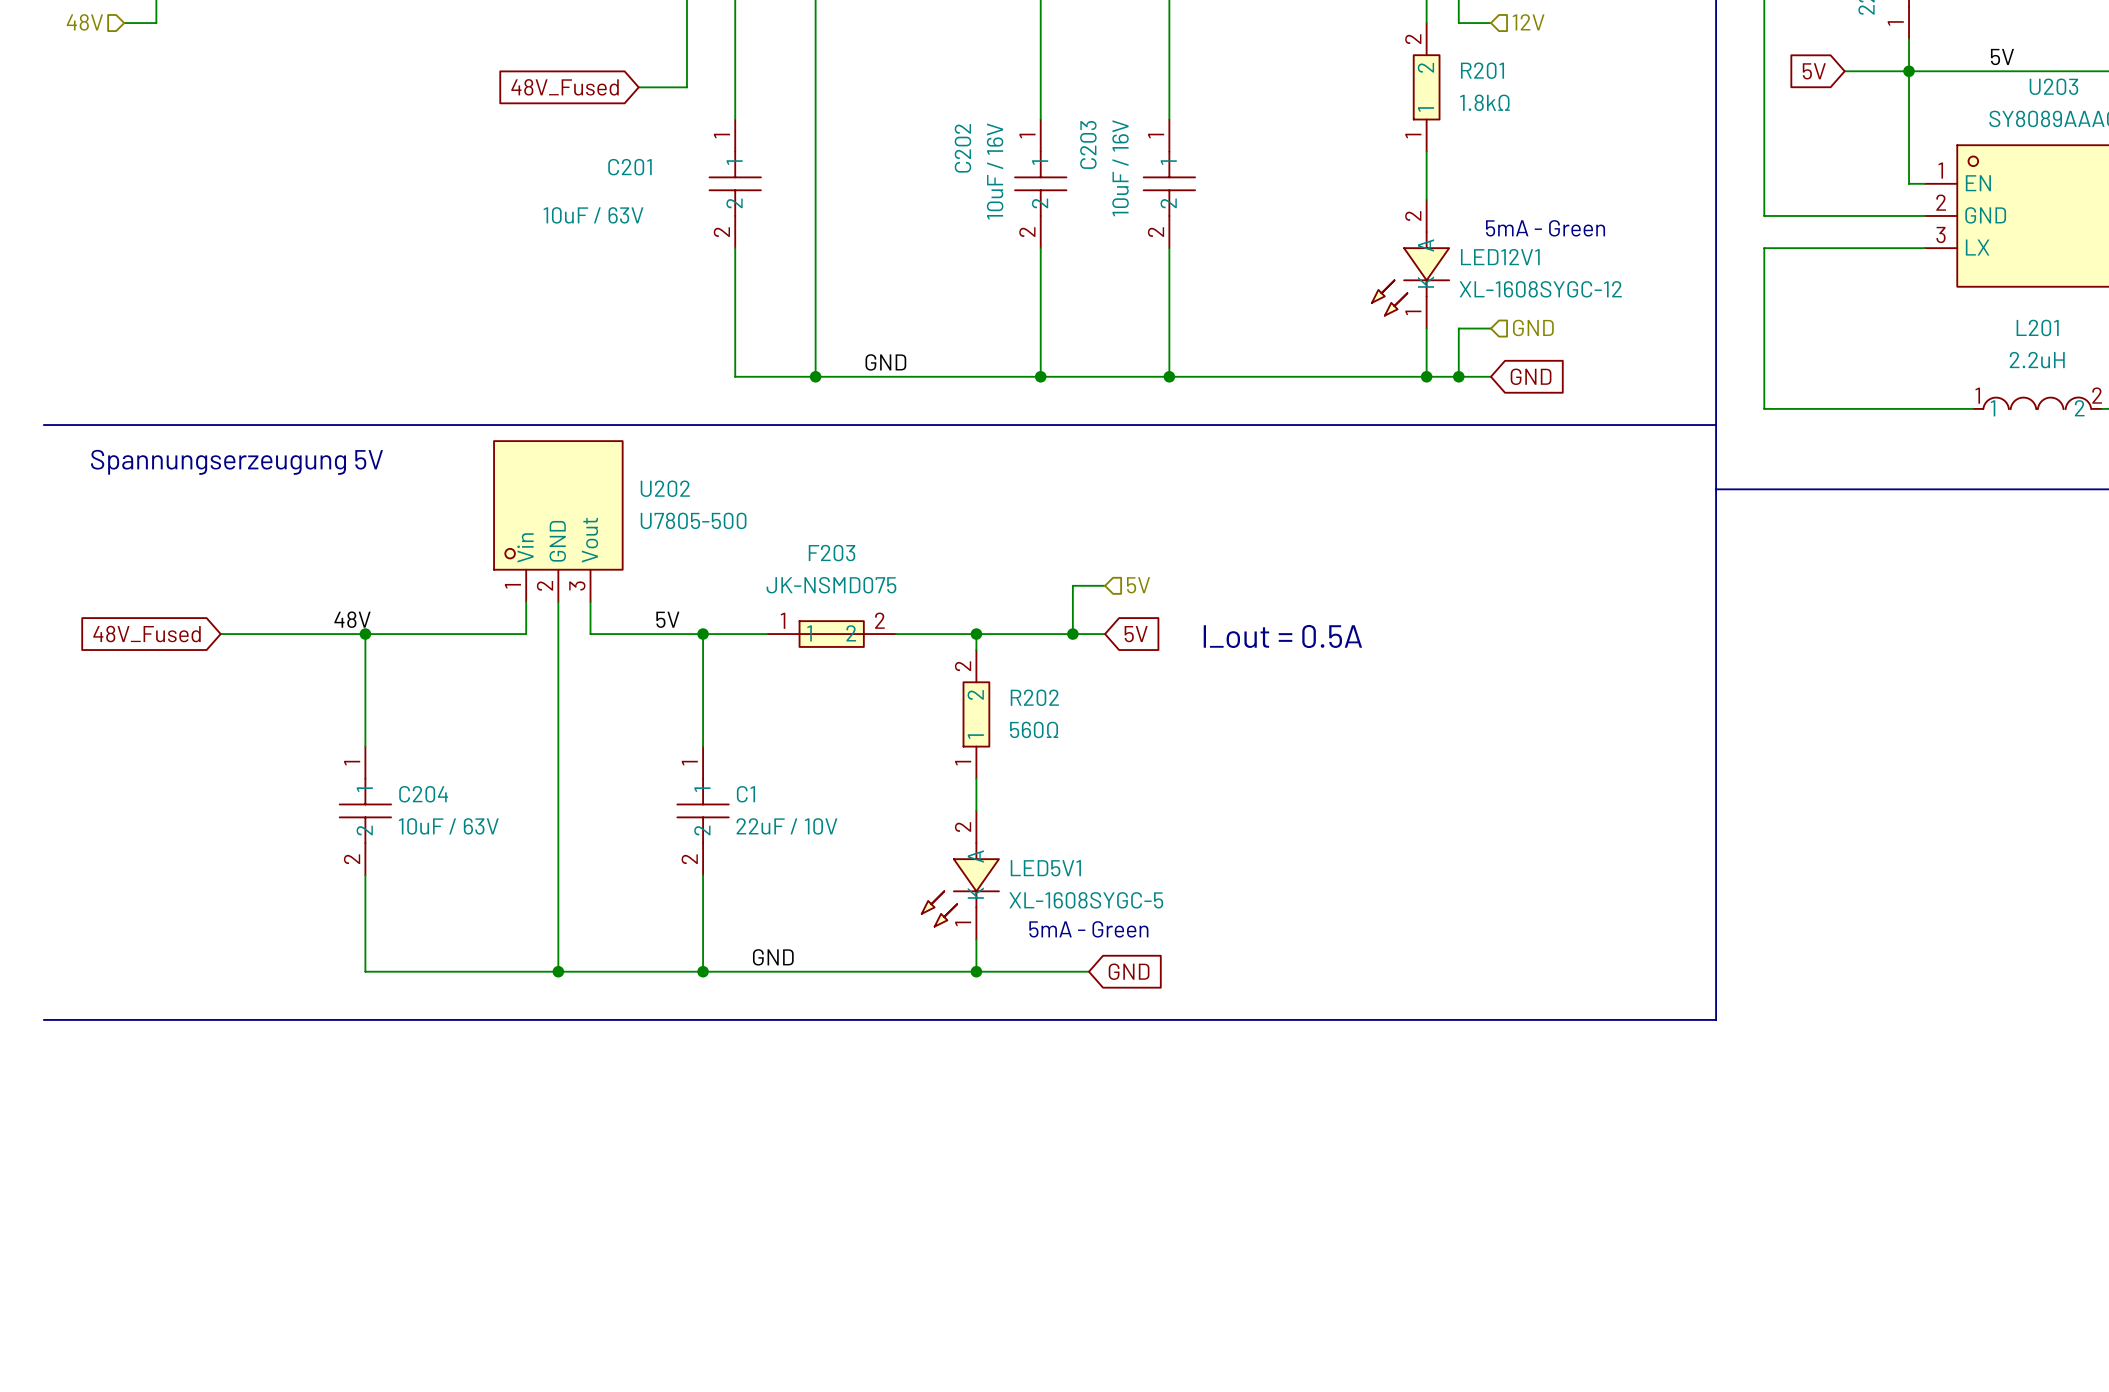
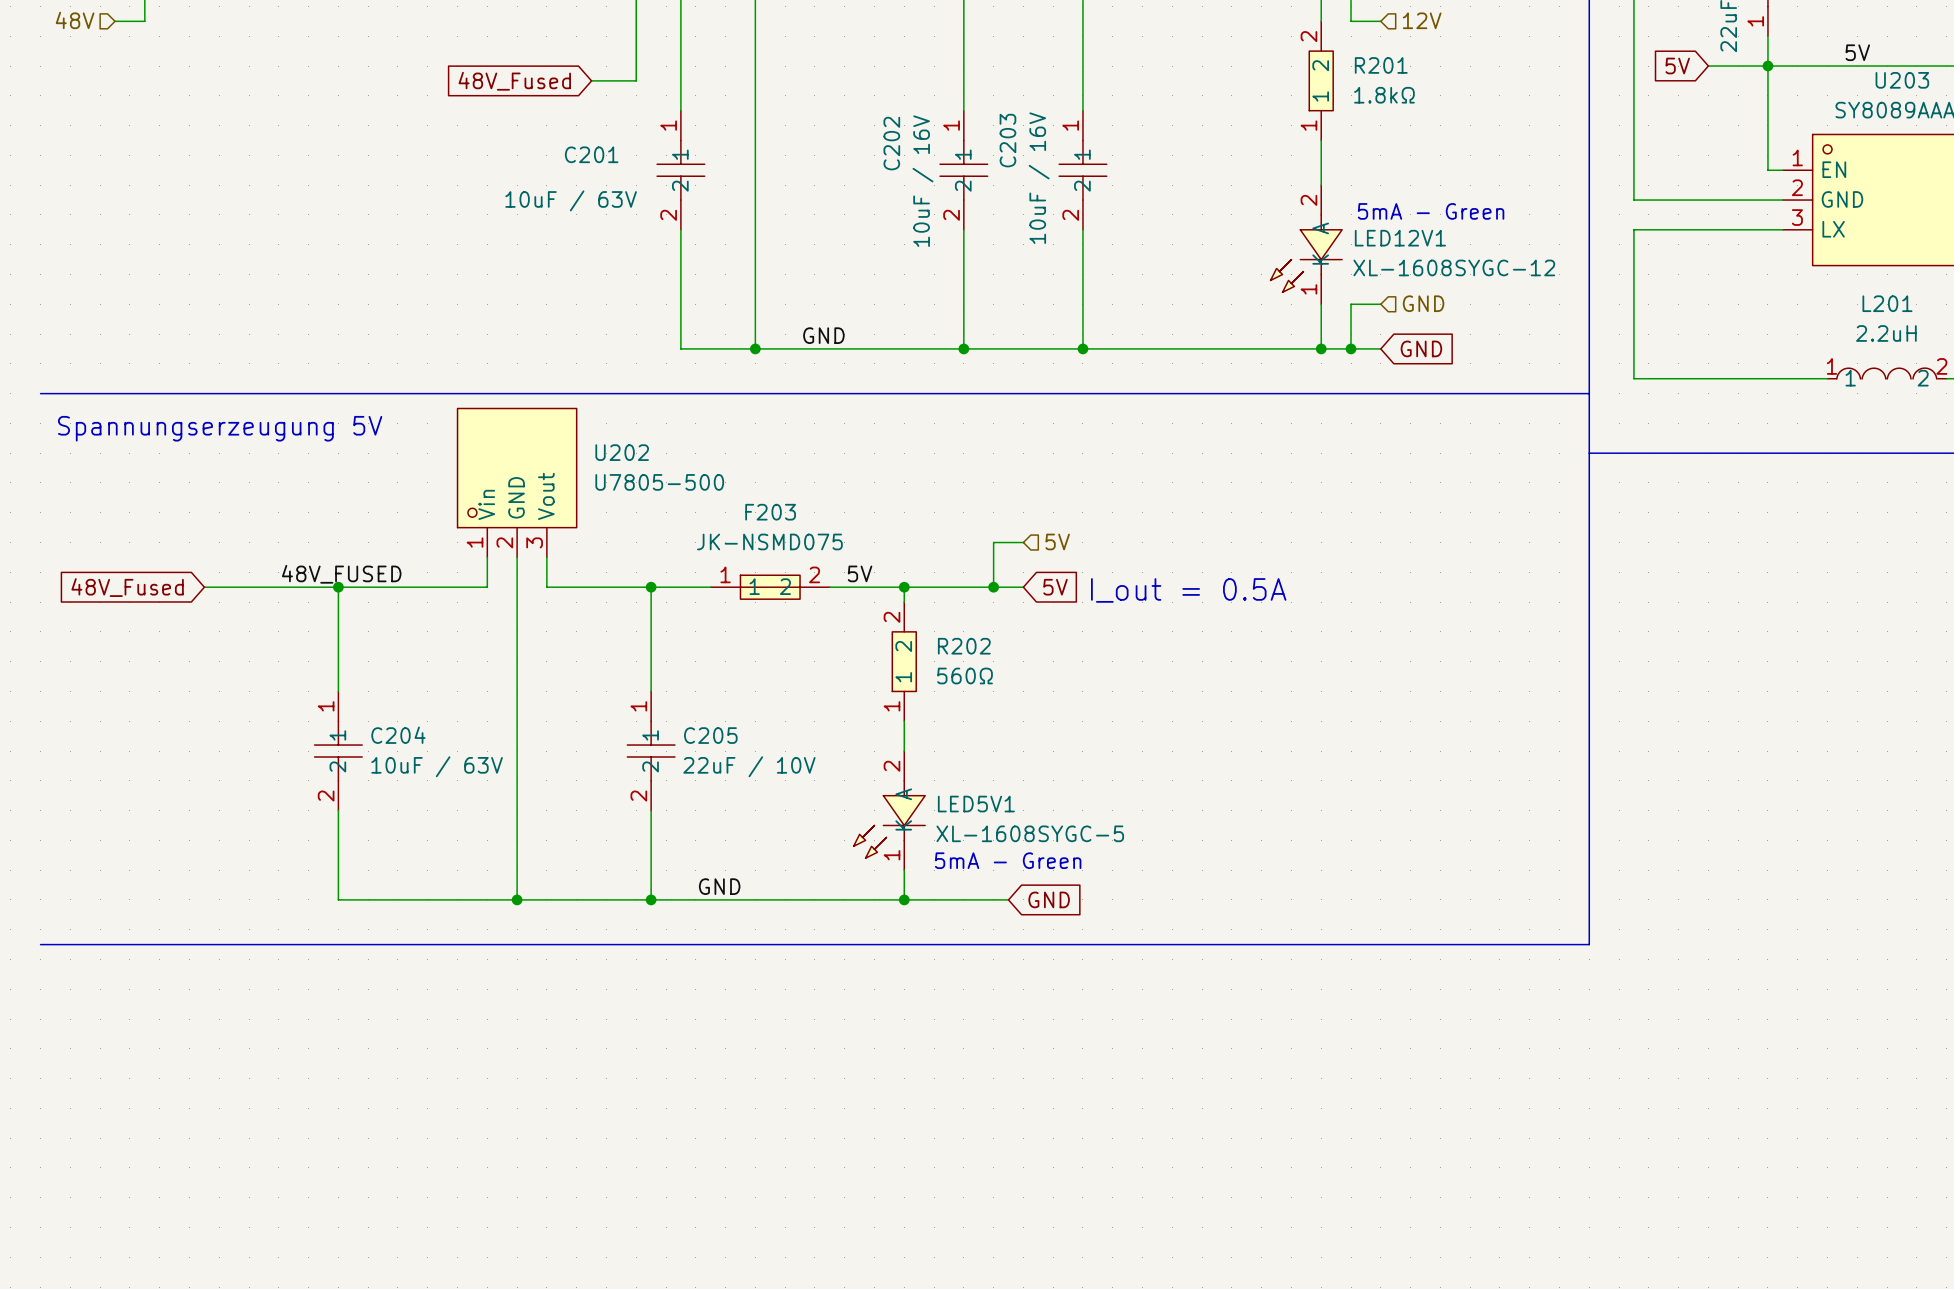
label: 48V (352, 619) -> none
label: none -> 48V_FUSED (341, 574)
label position: 5V (667, 619) -> 5V (860, 573)
C1 name: C1 (745, 794) -> C205 (710, 735)

